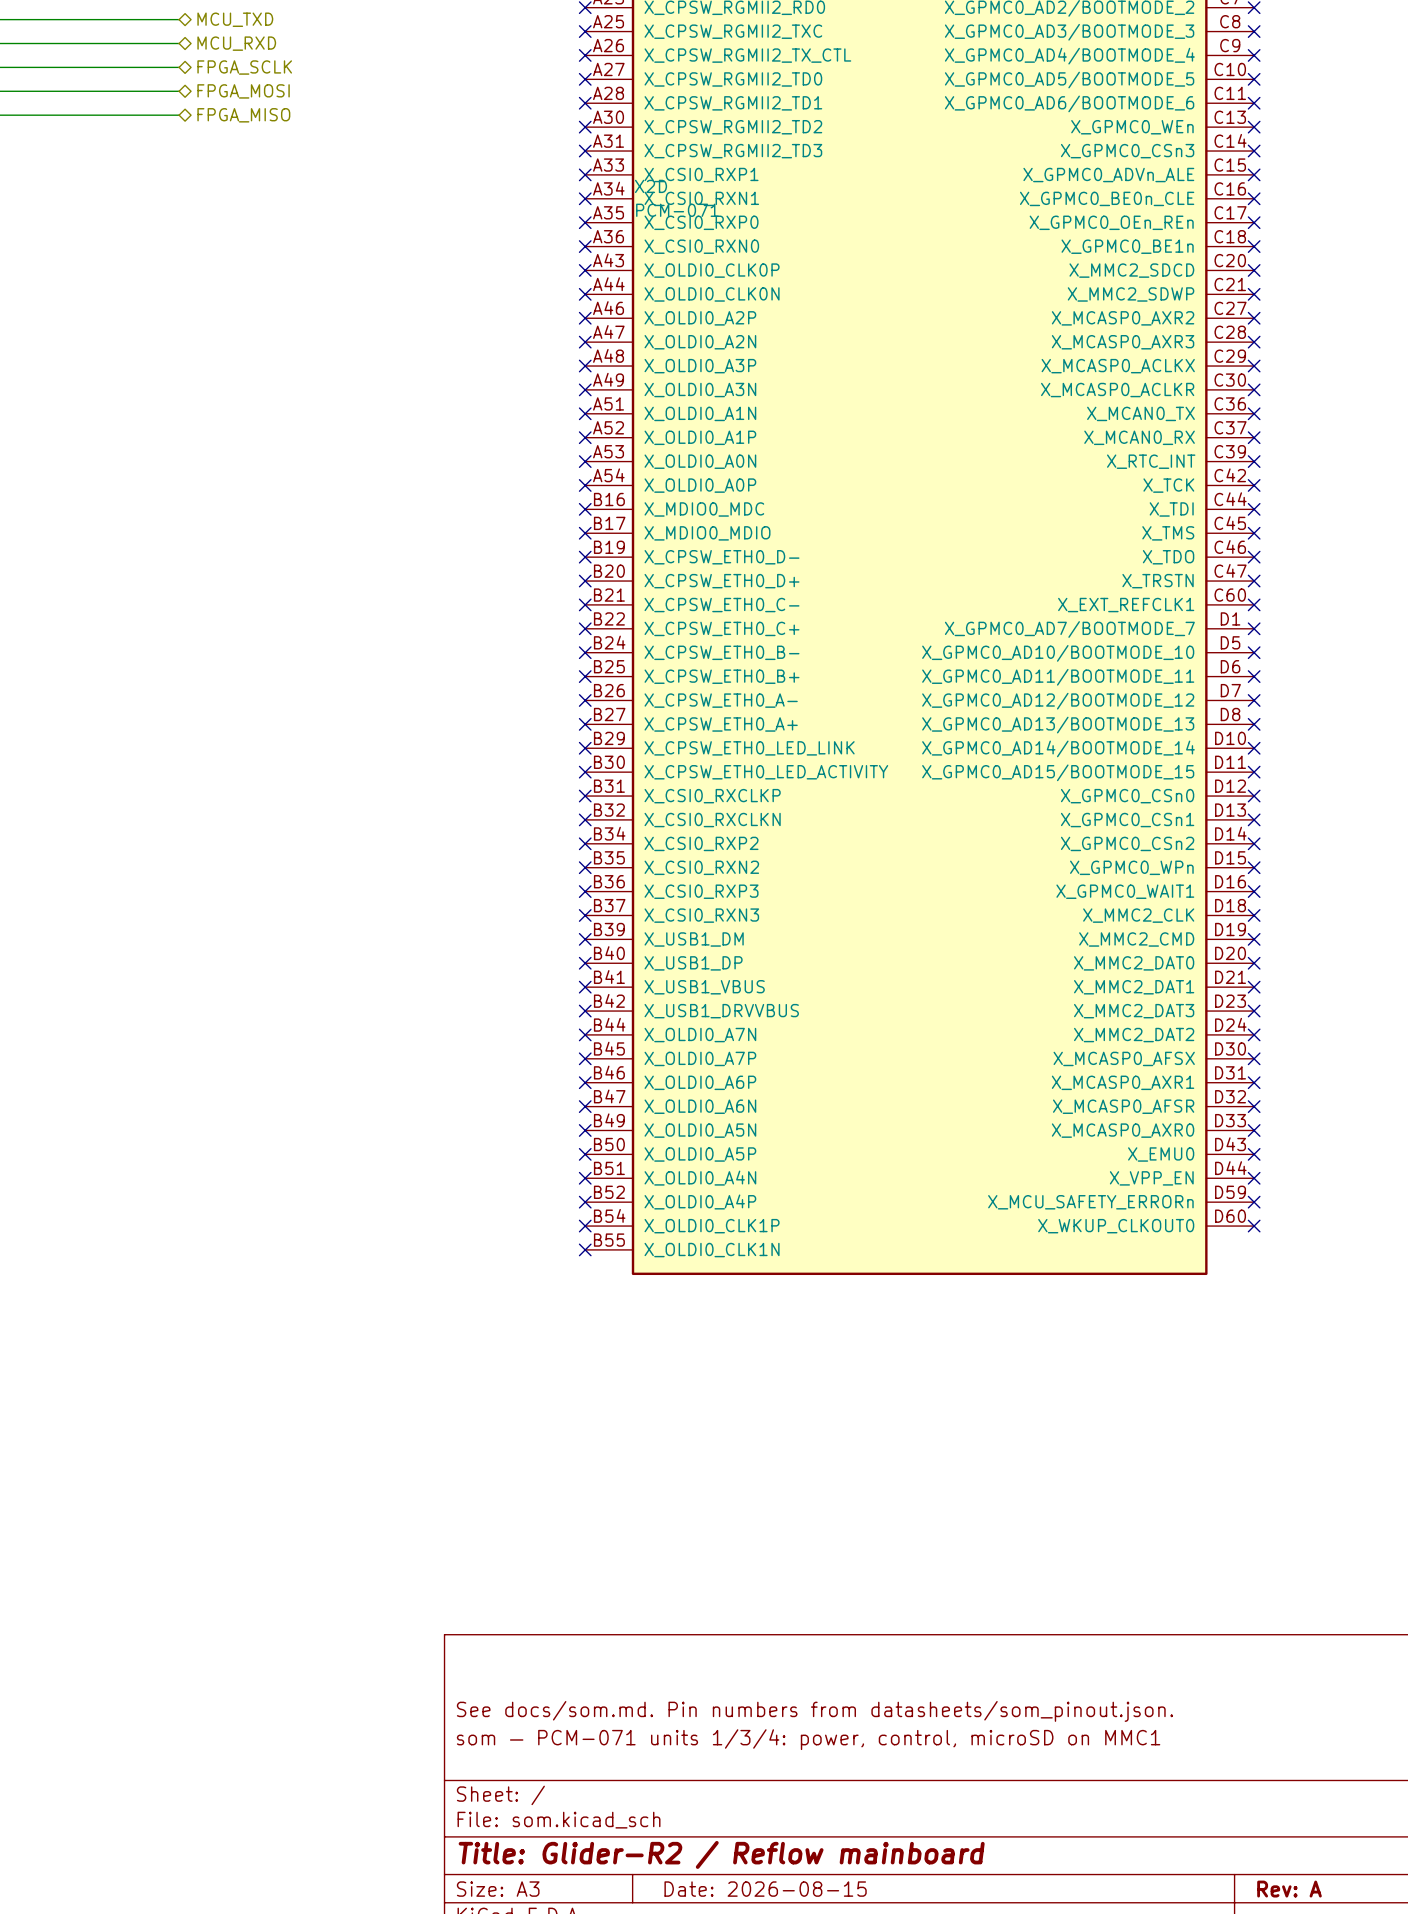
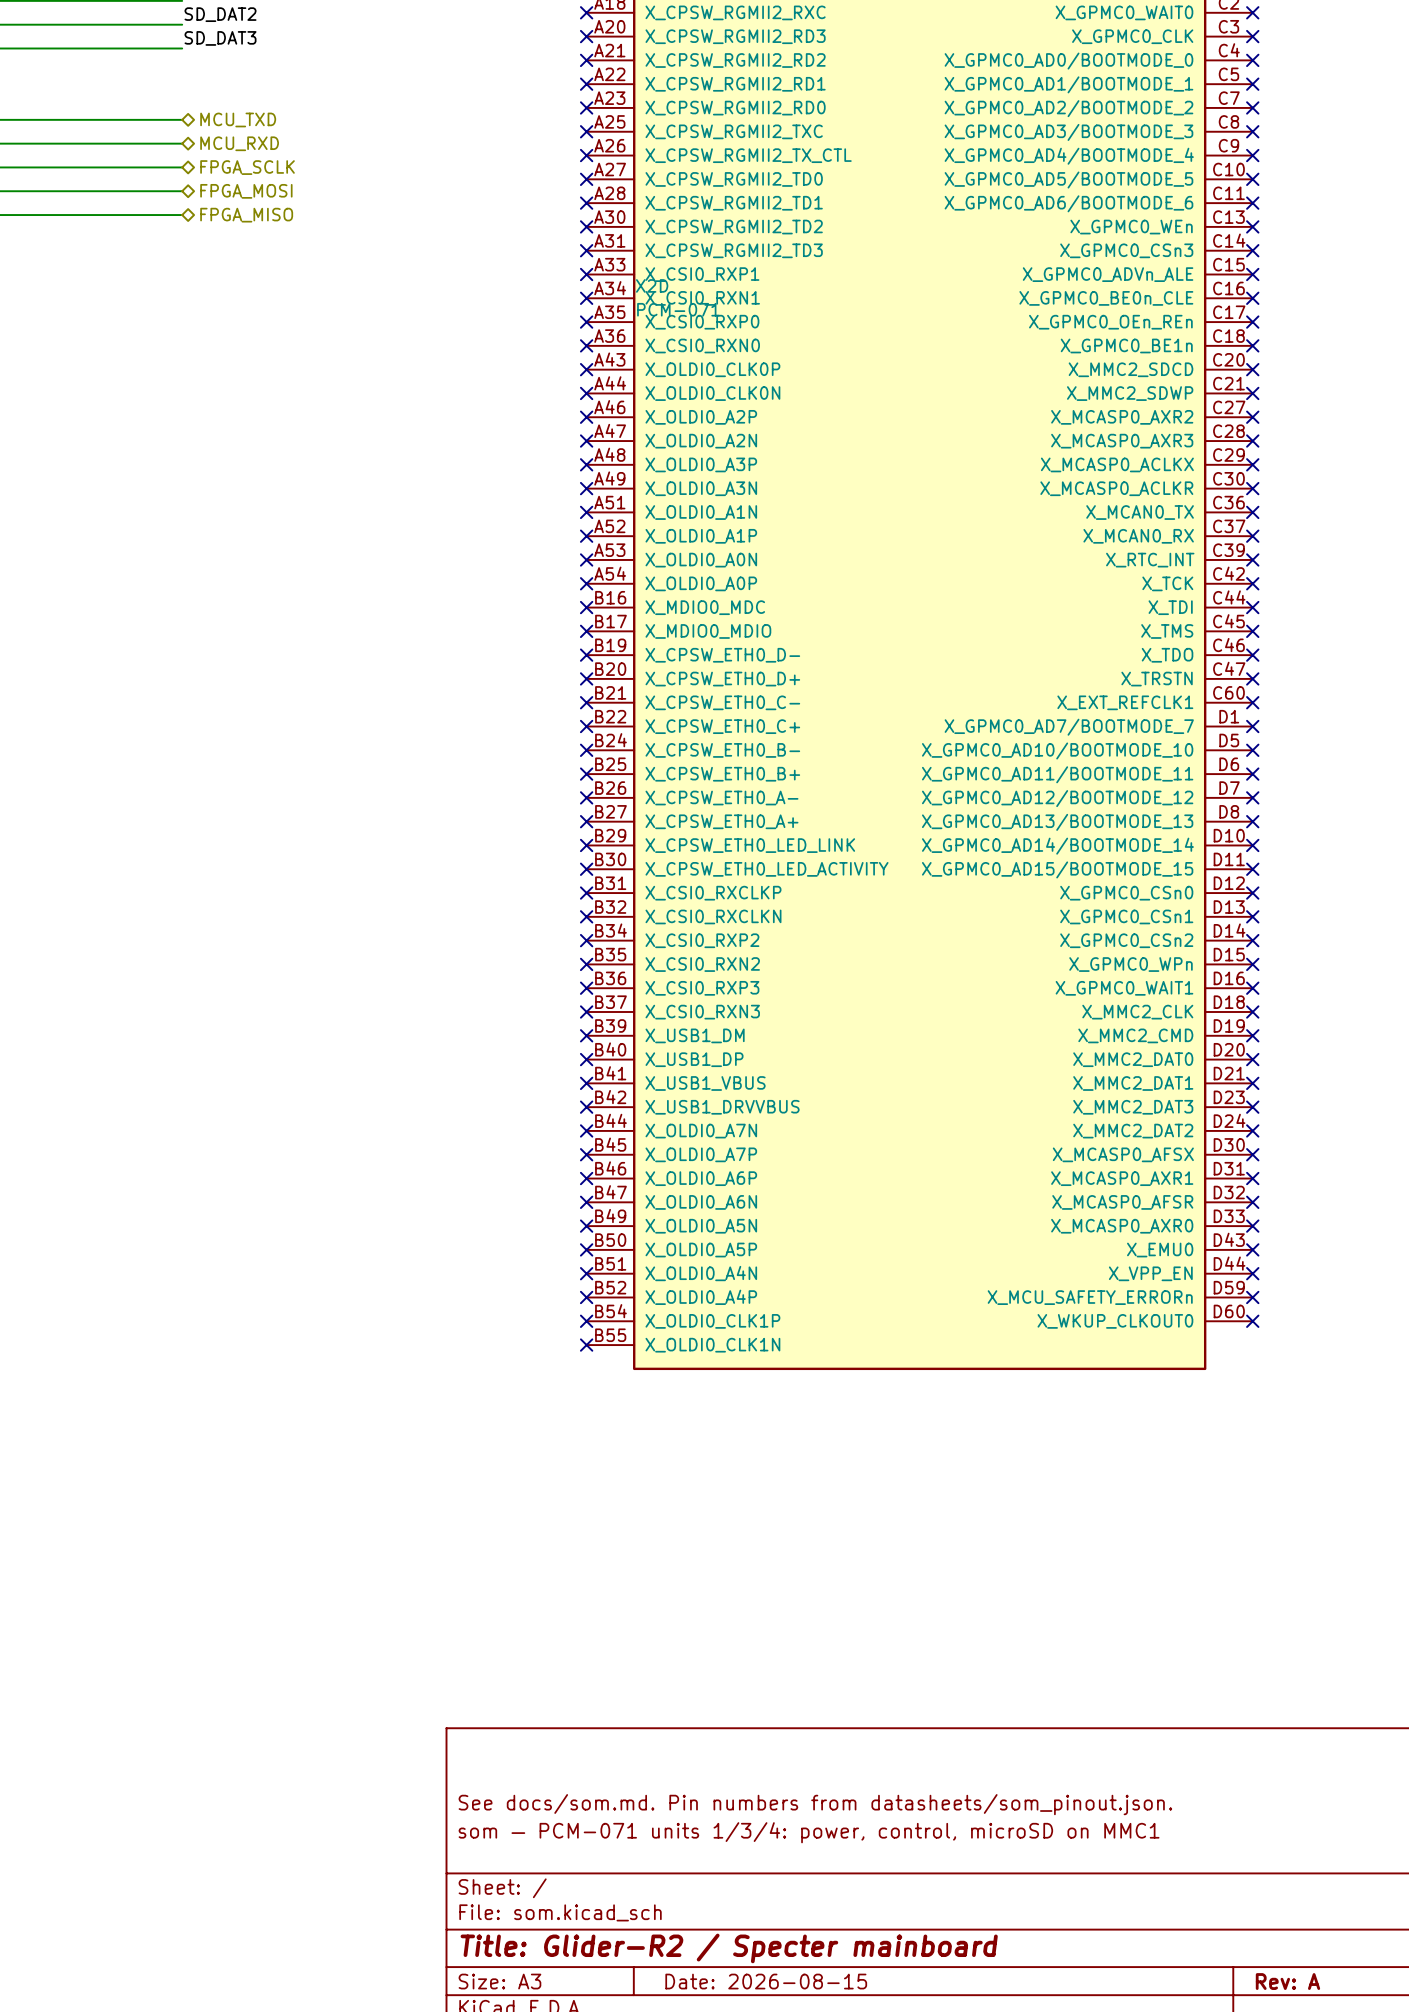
title block: Title: Glider-R2 / Reflow mainboard (721, 1854) -> Title: Glider-R2 / Specter mainboard (729, 1948)

